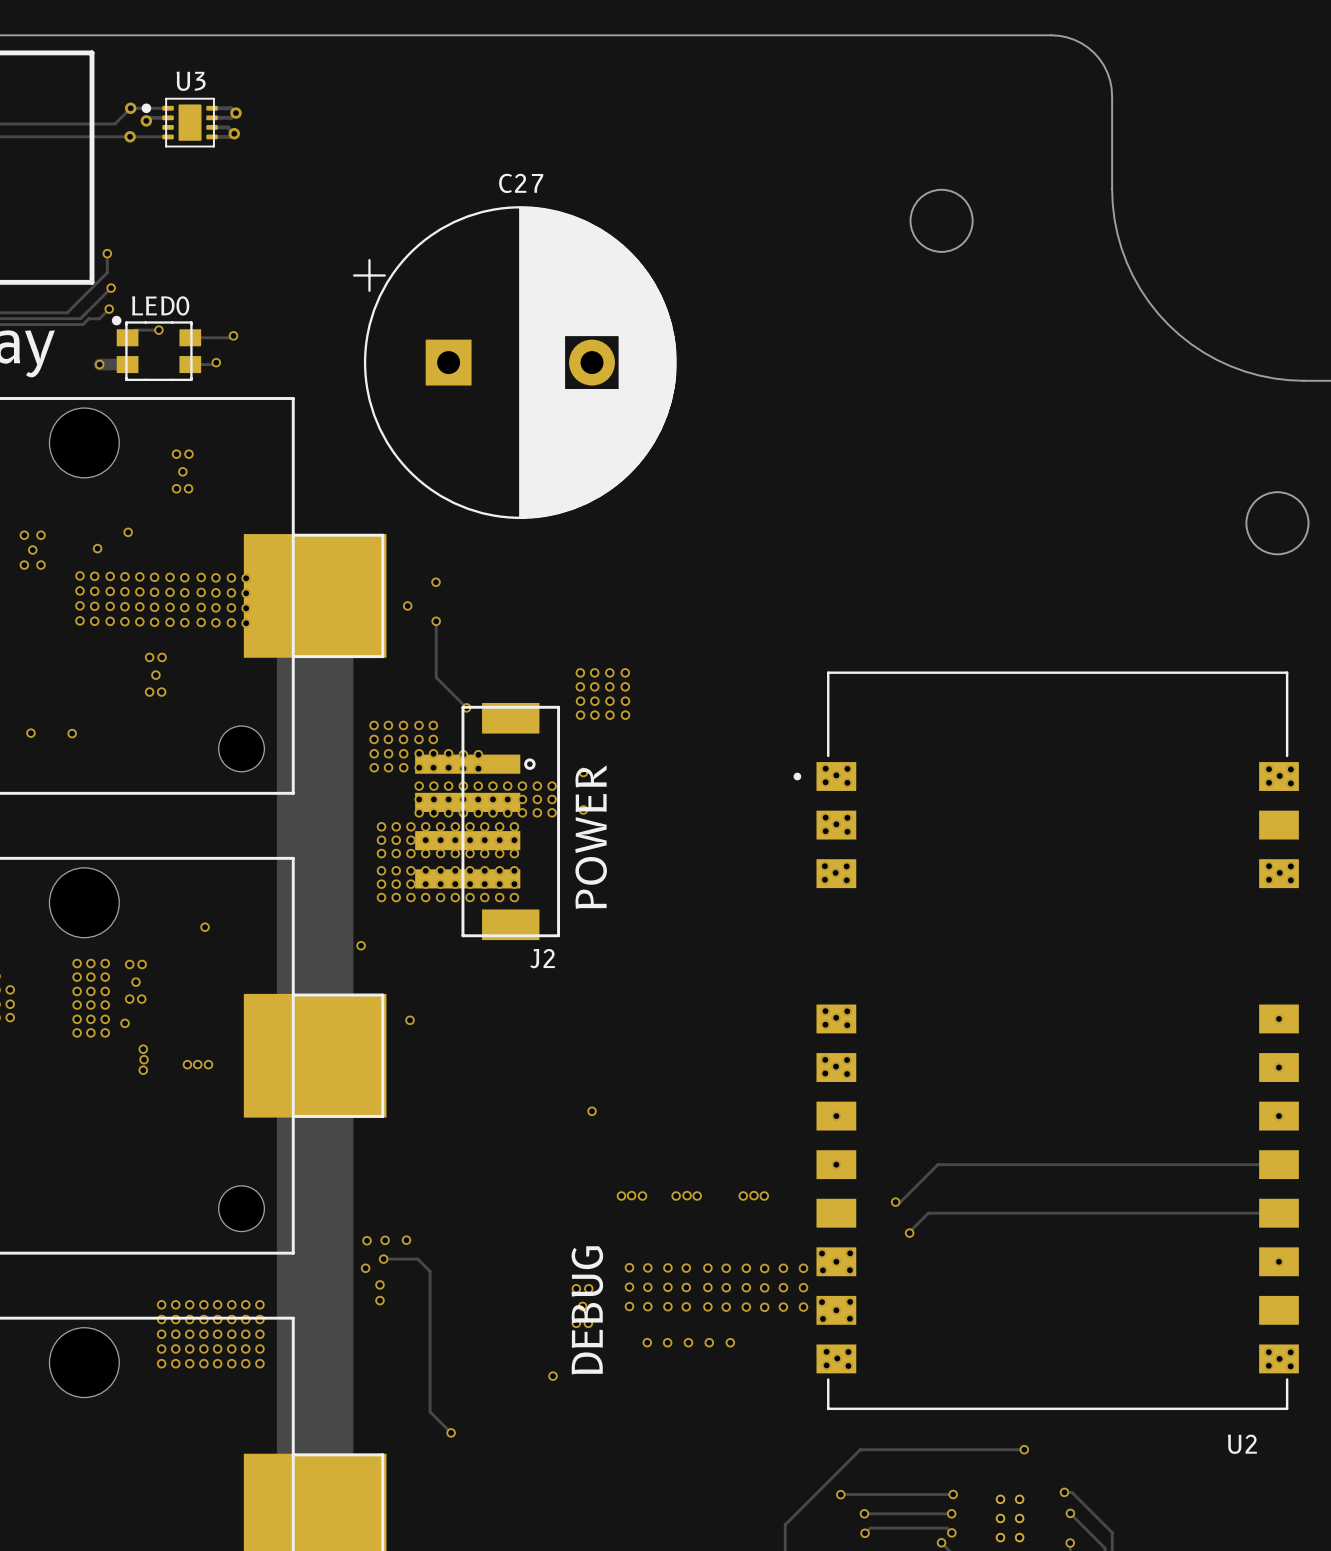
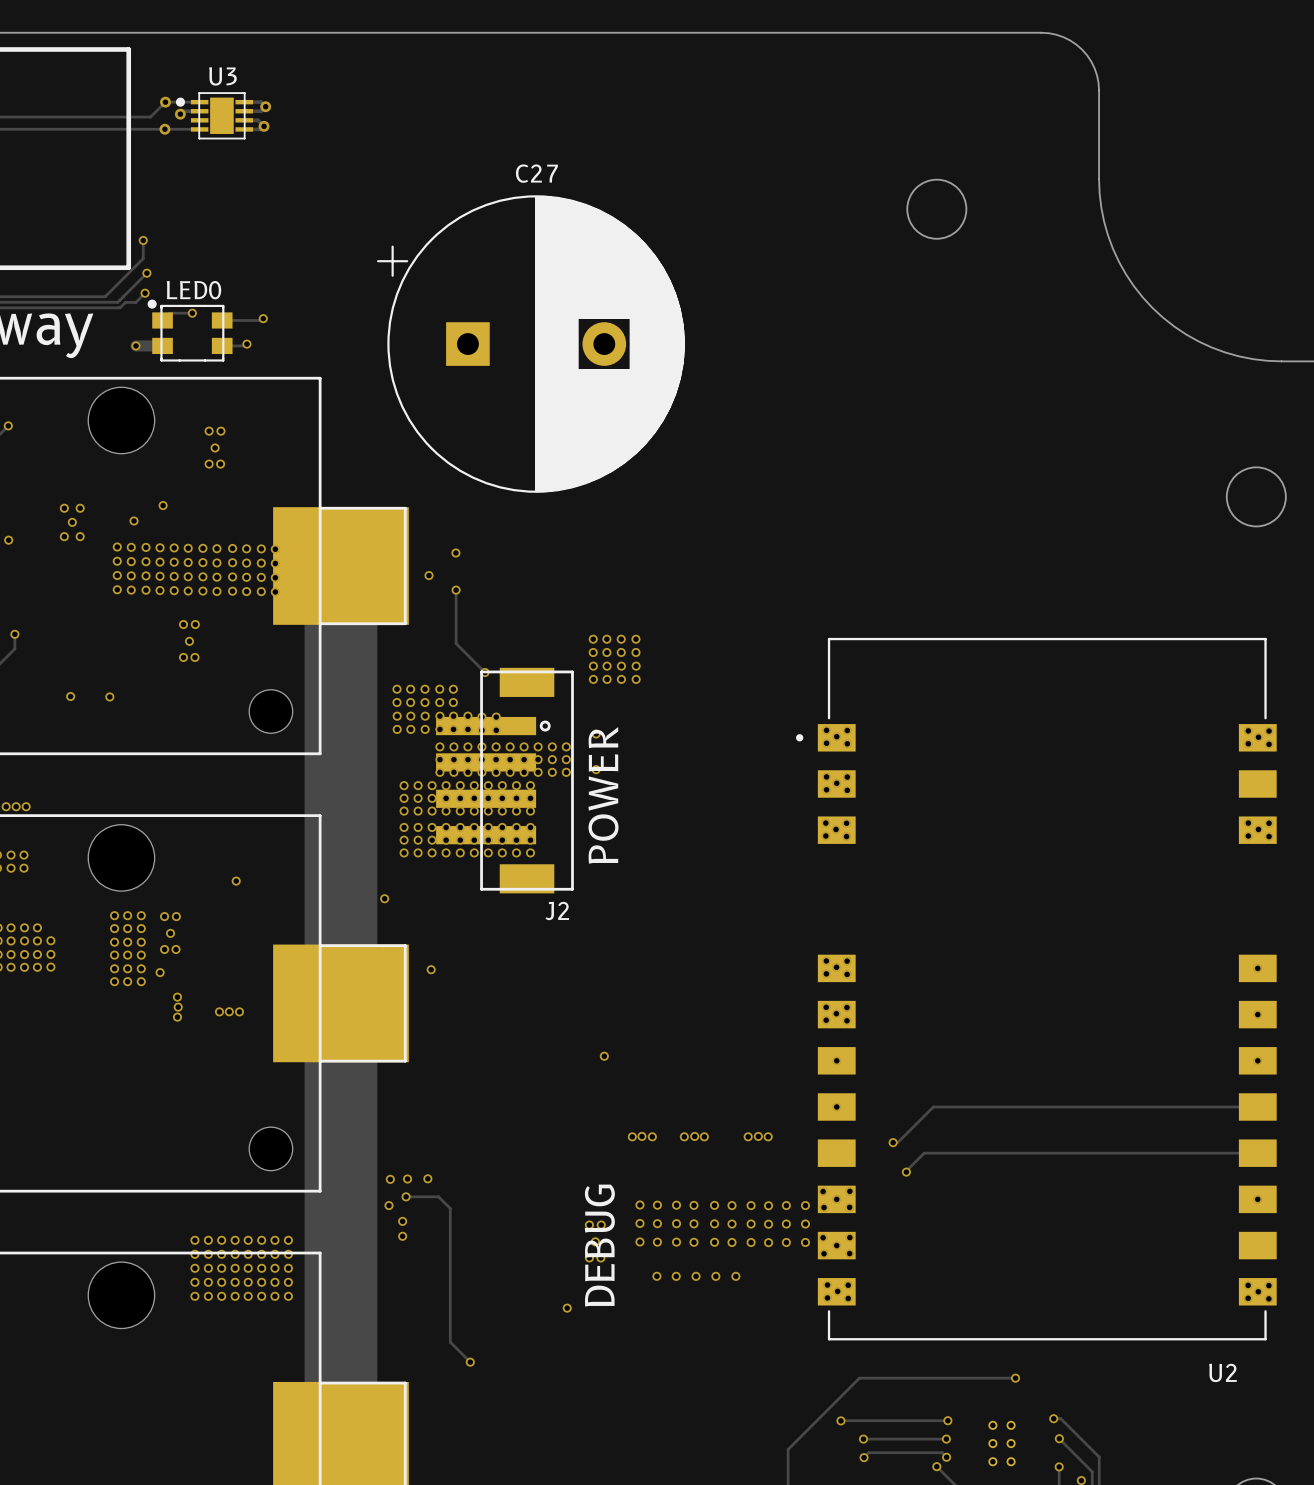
U3 footprint: [141, 97, 218, 148] -> [175, 92, 253, 140]

